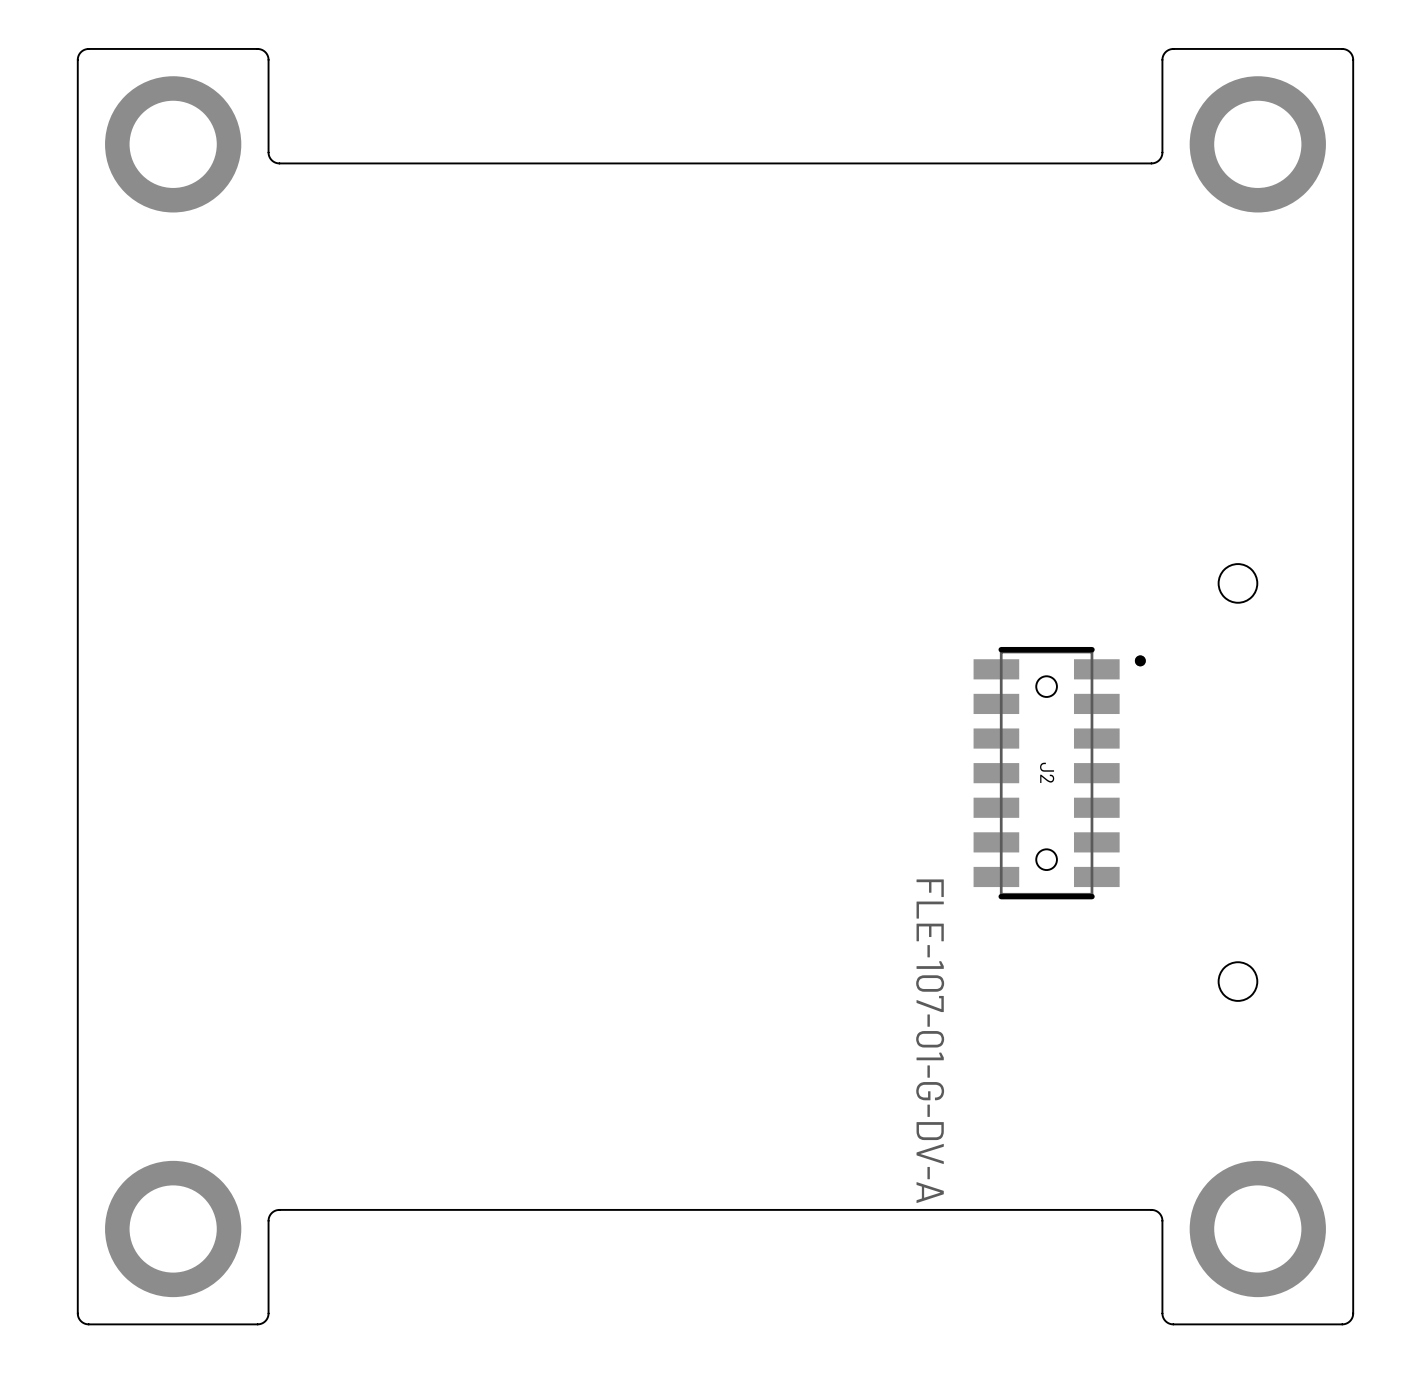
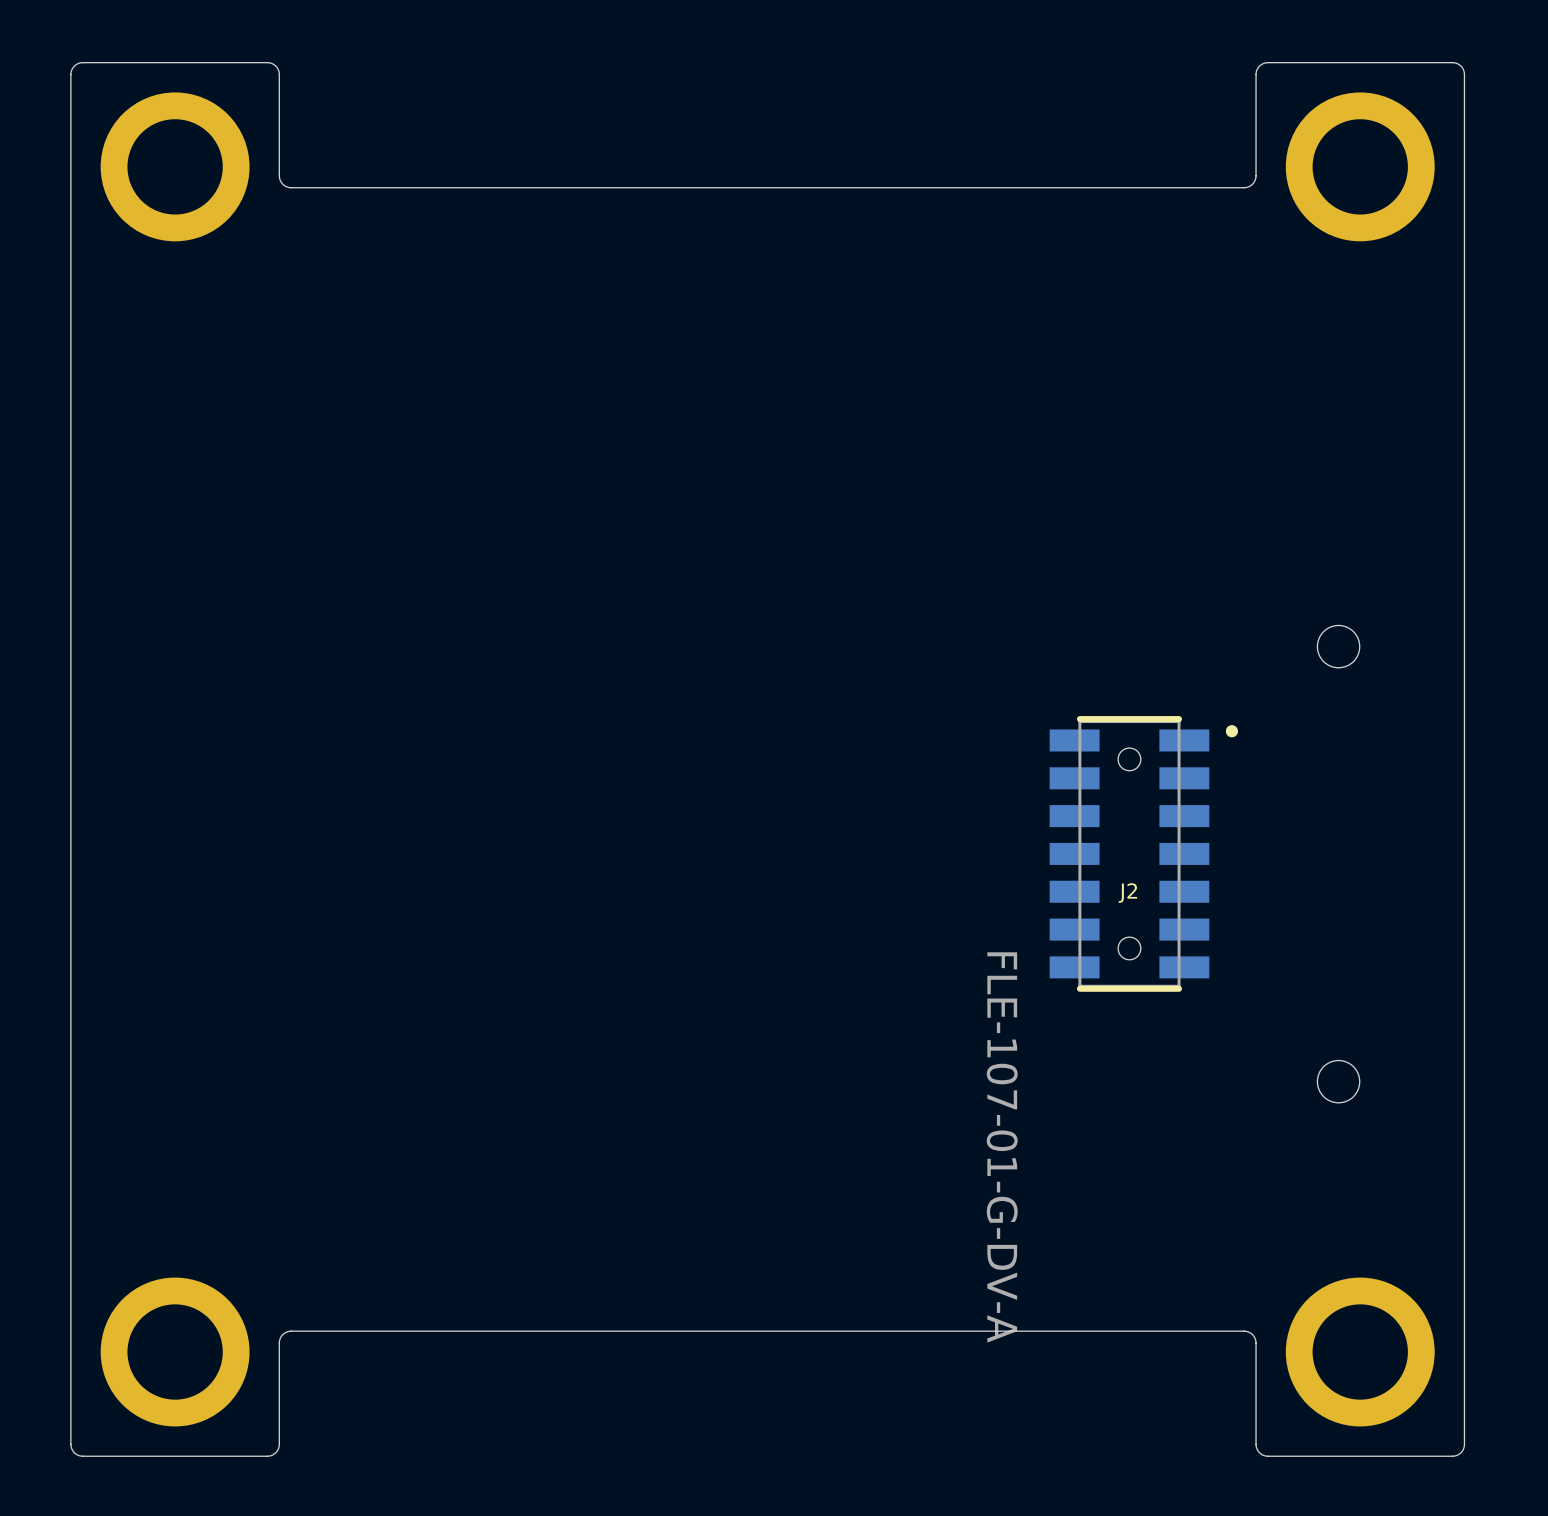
J2 name rotation: 0° (1047, 772) -> 90° counterclockwise (1127, 893)
J2 name position: J2 (1047, 772) -> J2 (1127, 893)

